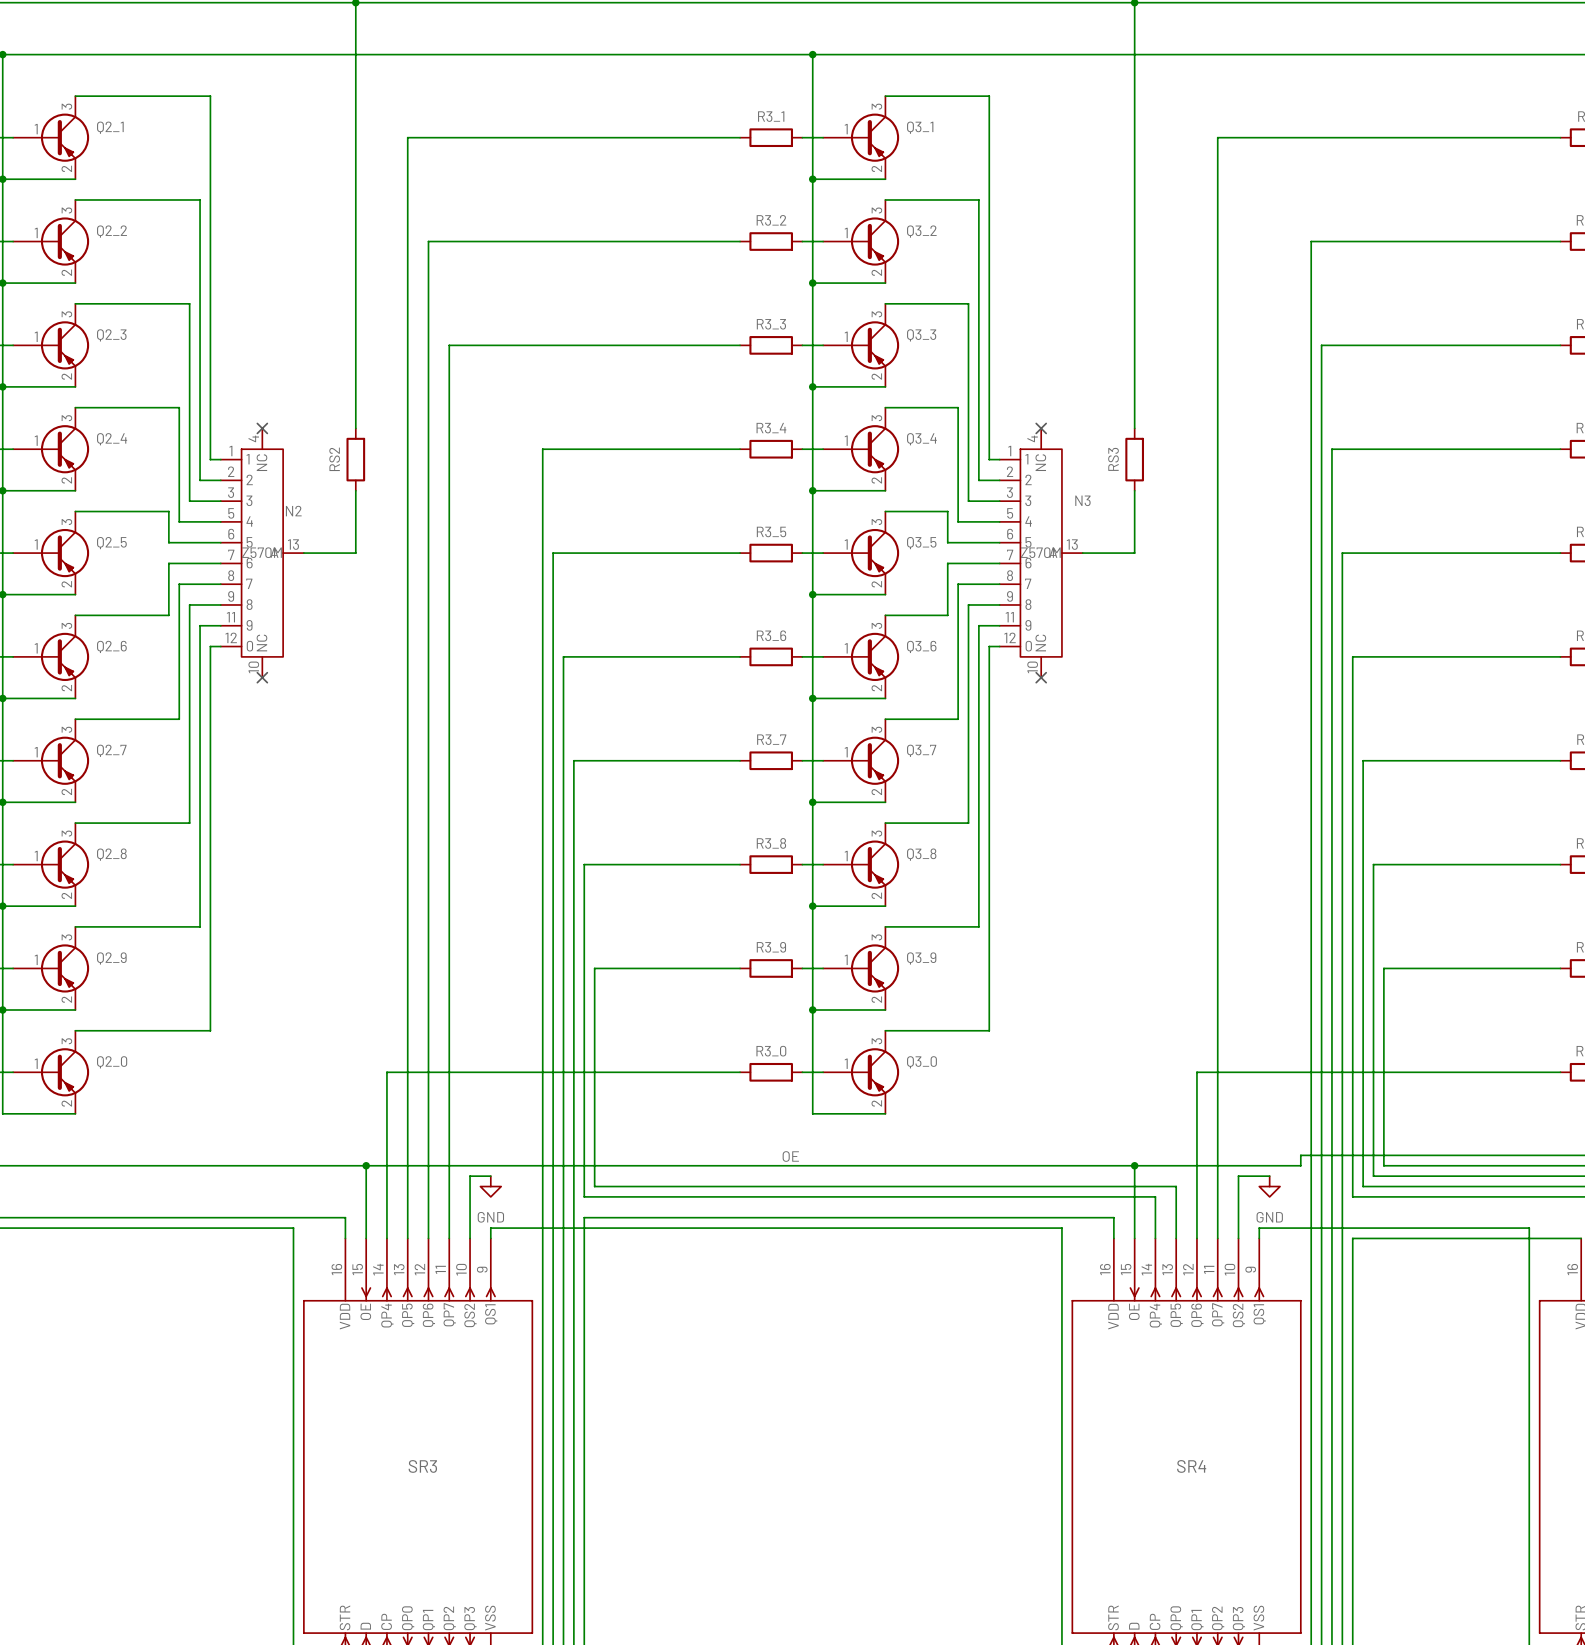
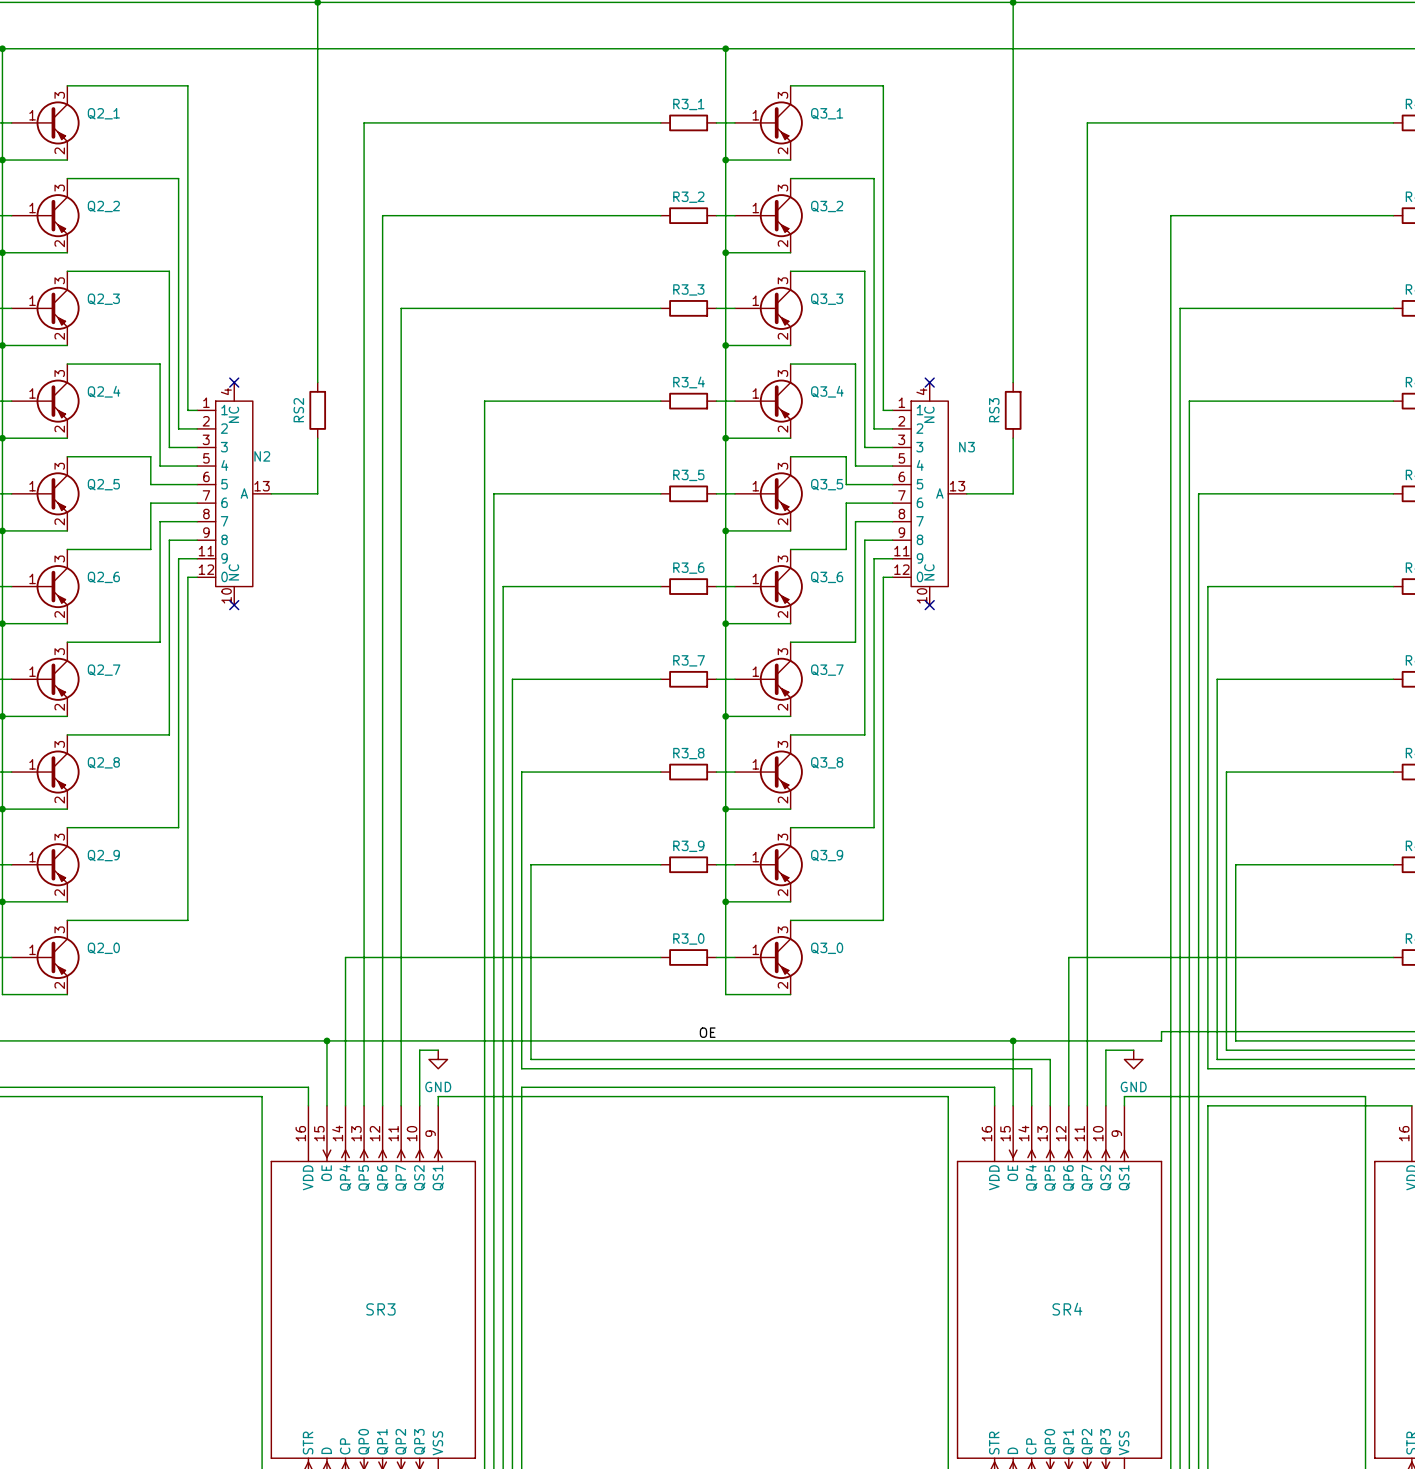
N2 value: Z570M (261, 552) -> none
N3 value: Z570M (1040, 552) -> none

